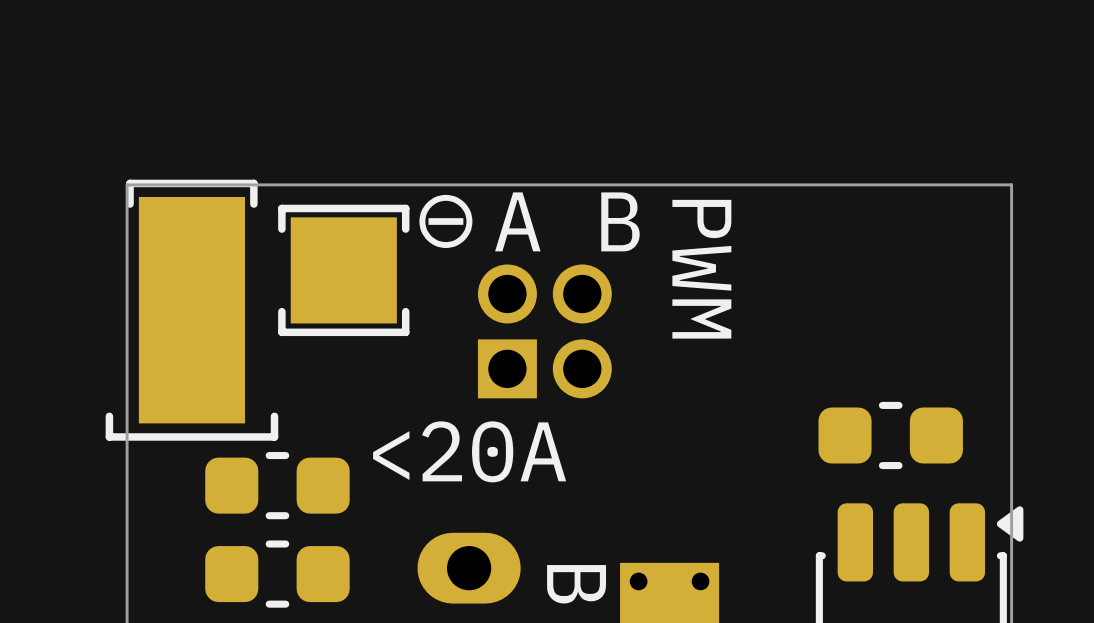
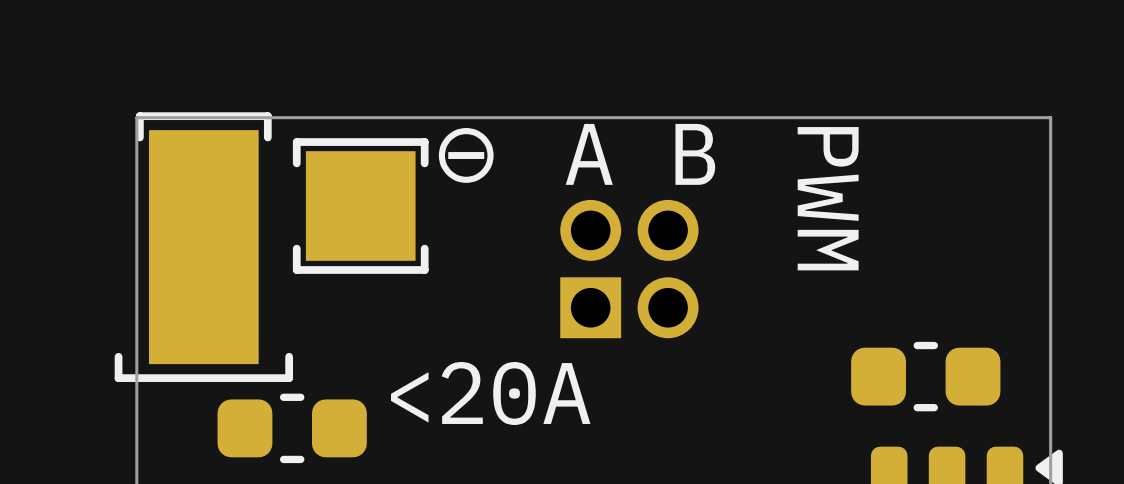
text position: A B (567, 221) -> A B (640, 154)
text position: PWM (701, 269) -> PWM (828, 198)
part position: (544, 331) -> (629, 269)

